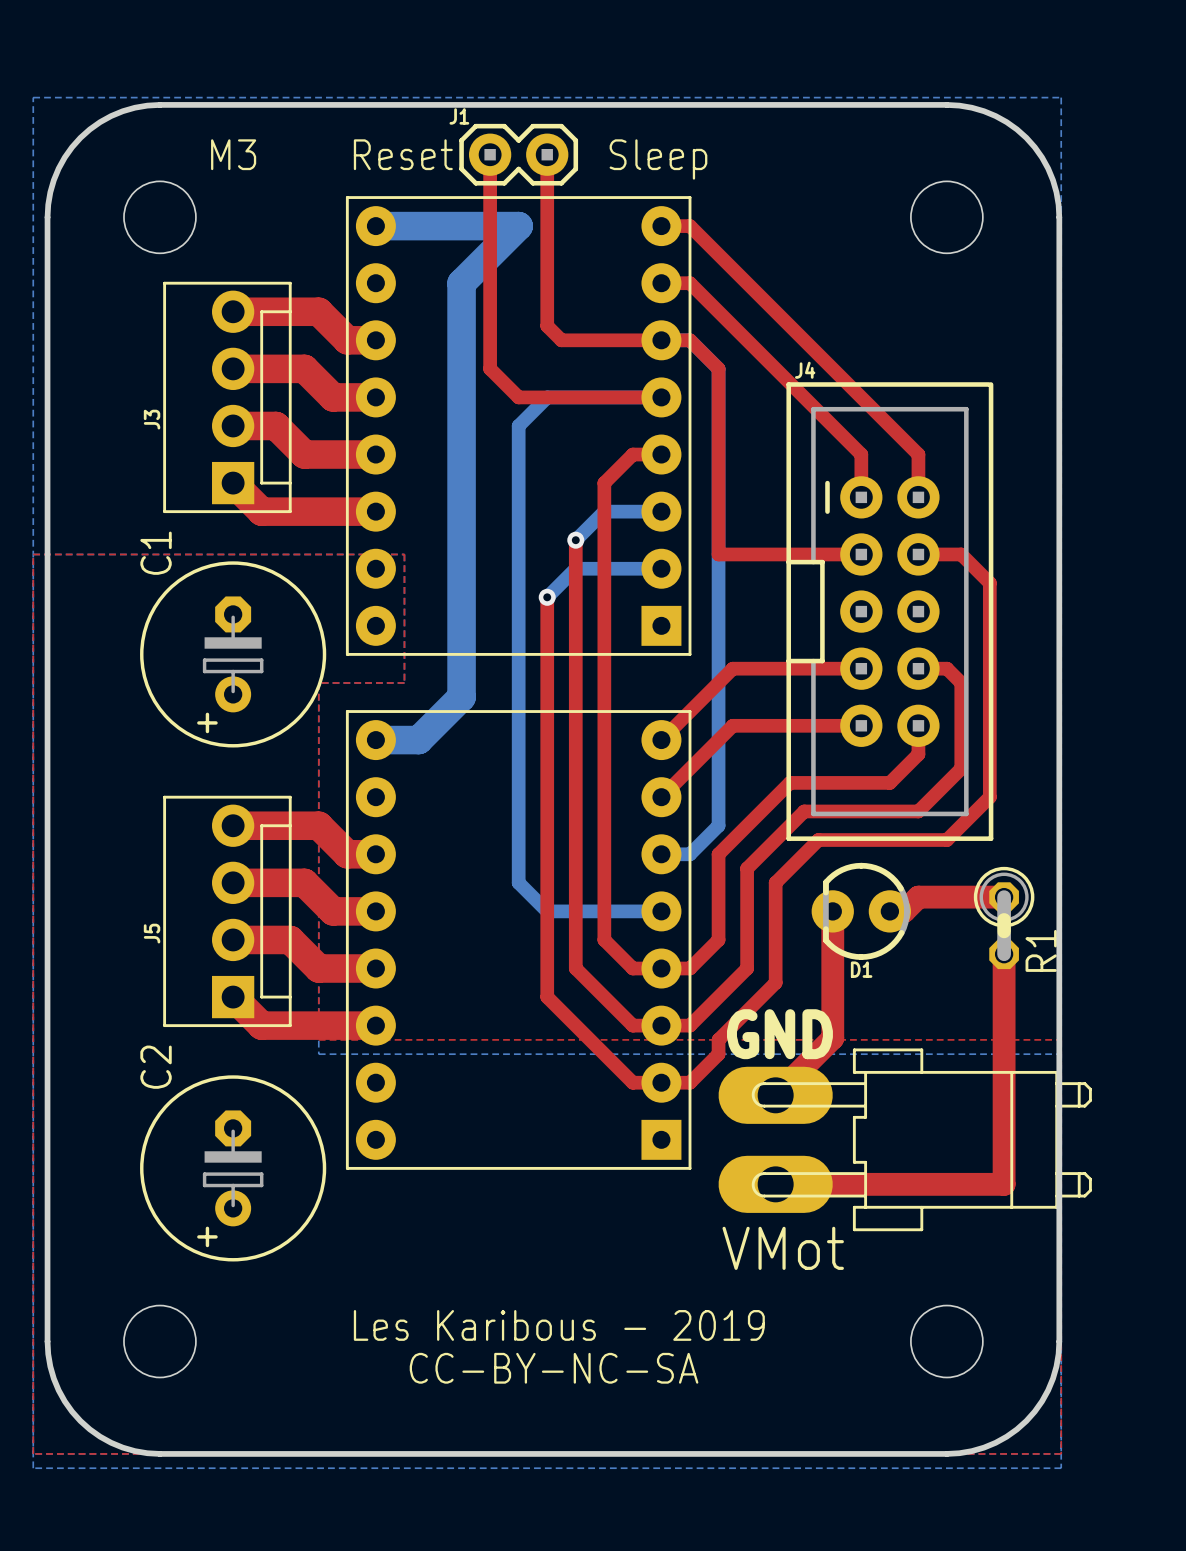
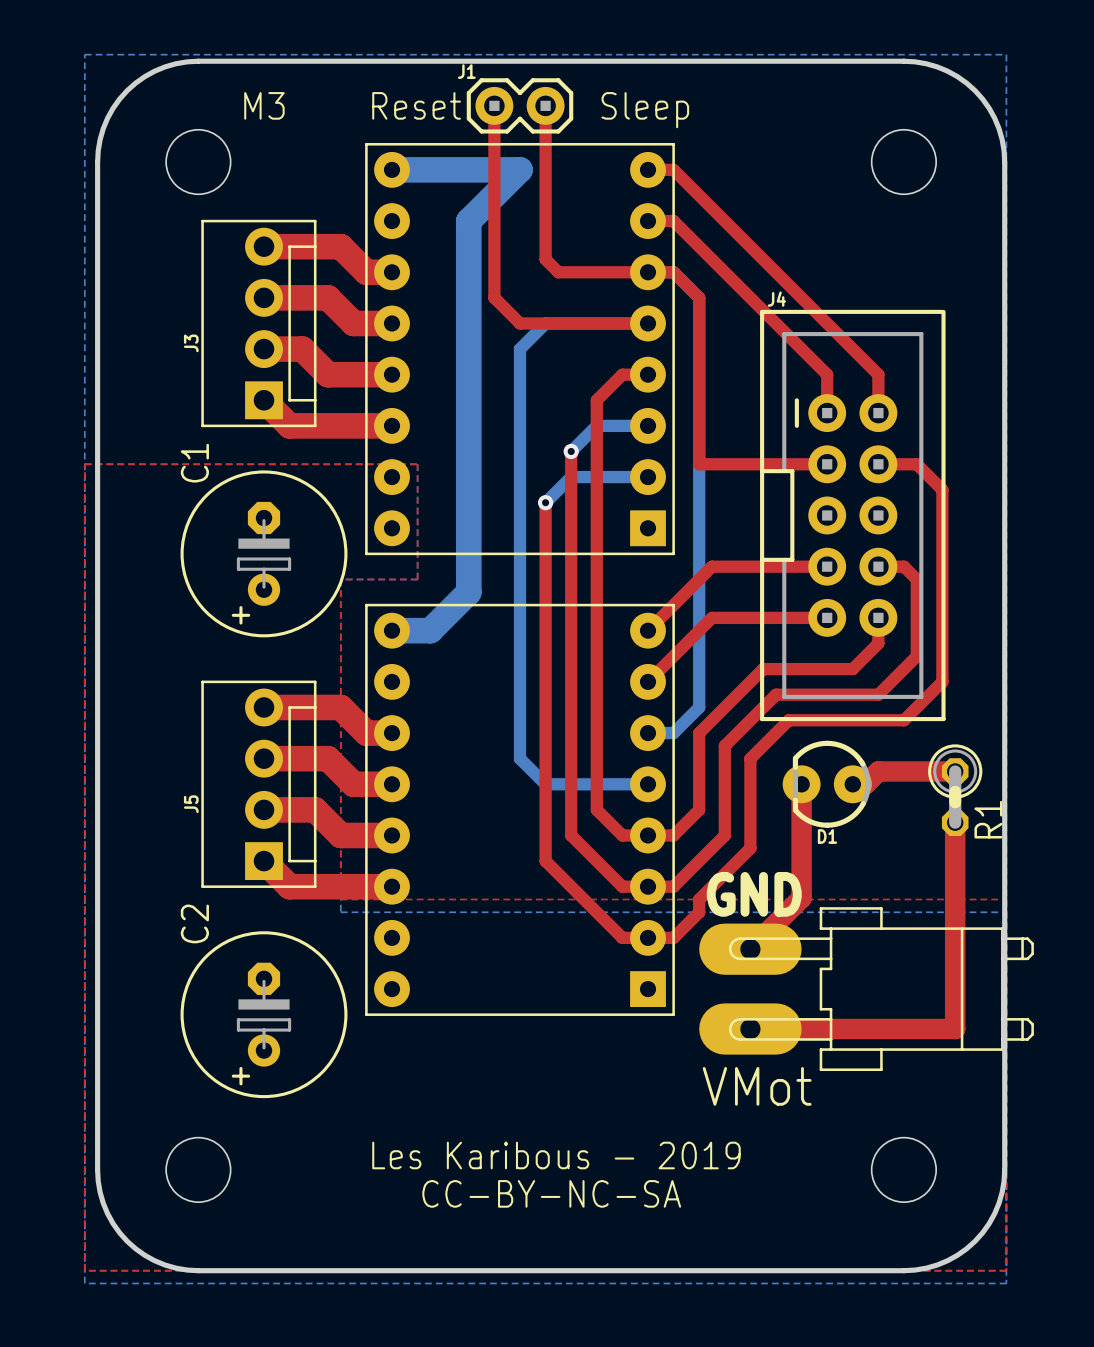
part footprint: [718, 1048, 1092, 1232] -> [699, 907, 1034, 1072]

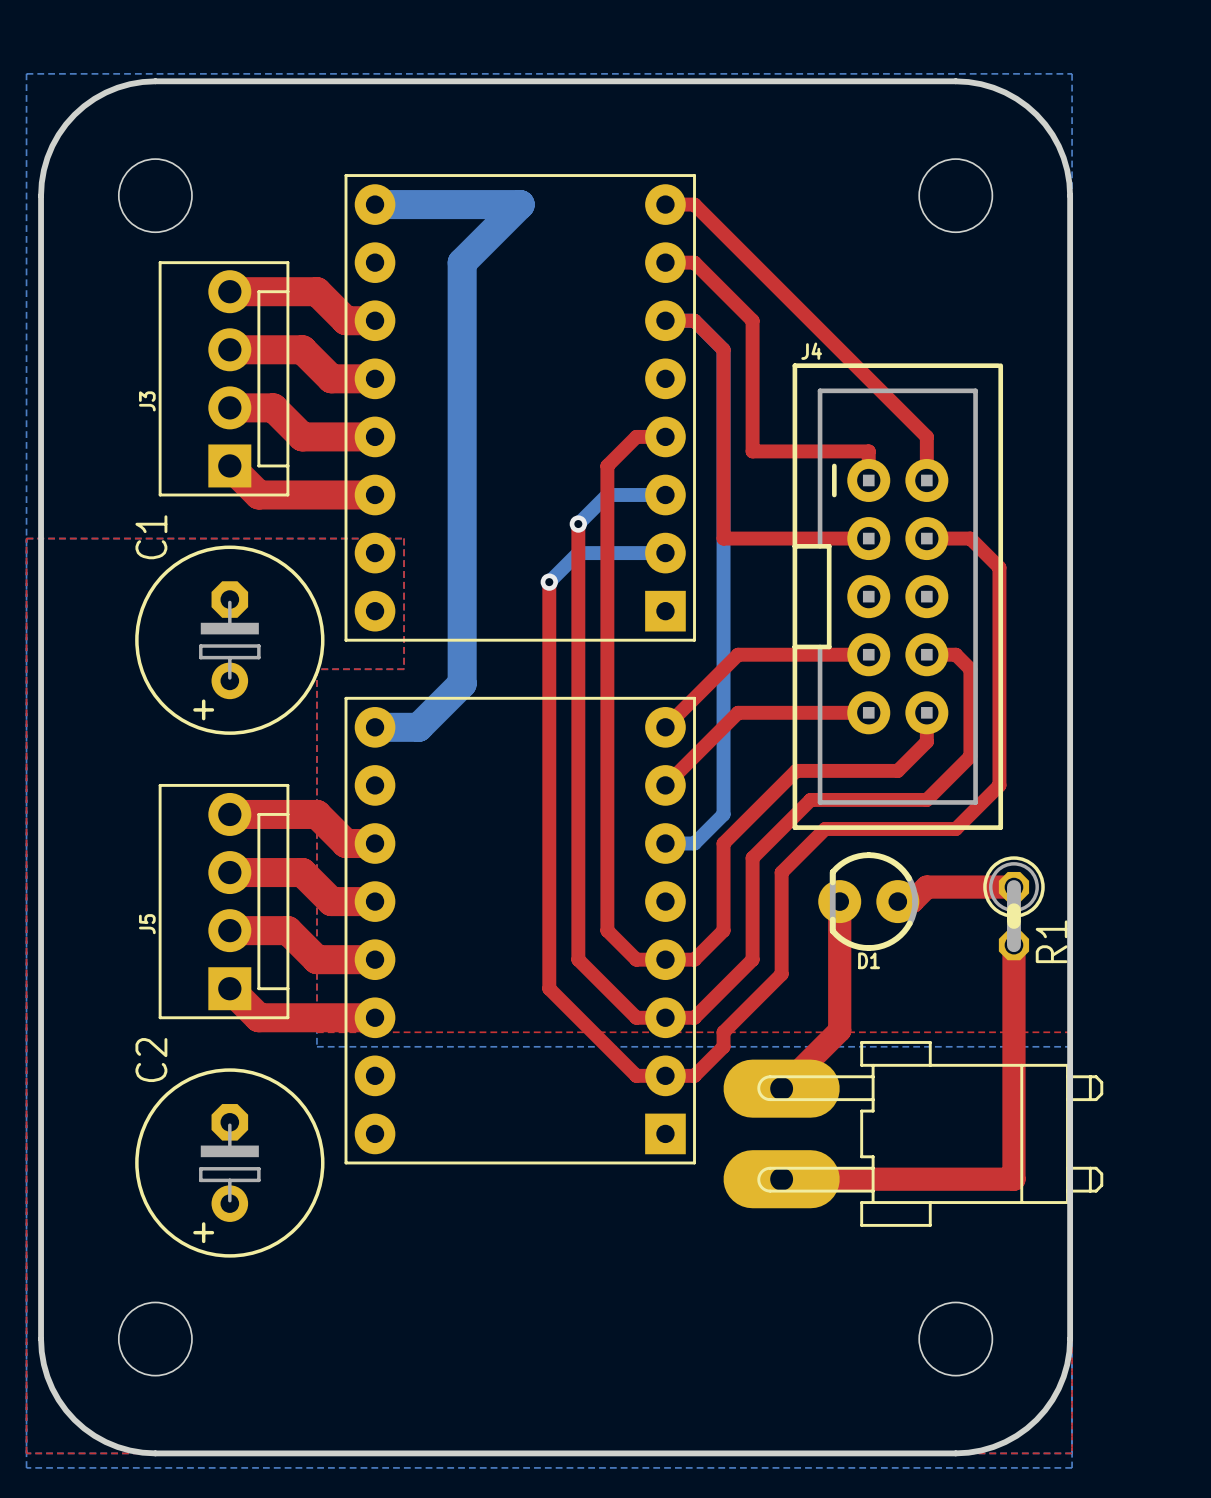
text: M3 (264, 105) -> none
text: Reset (416, 105) -> none
top track: (494, 105) (494, 297) (520, 323) (648, 323) -> none
J1: (520, 105) -> none
top track: (545, 105) (545, 259) (558, 272) (648, 272) -> none
text: Sleep (645, 110) -> none
top track: (724, 272) (827, 374) (827, 387) -> (752, 320) (752, 451) (868, 451)
bottom track: (648, 323) (545, 323) (520, 349) (520, 758) (545, 784) (648, 784) -> none
text: GND (754, 894) -> none
text: VMot (757, 1086) -> none
text: Les Karibous - 2019 (556, 1155) -> none
text: CC-BY-NC-SA (551, 1193) -> none

